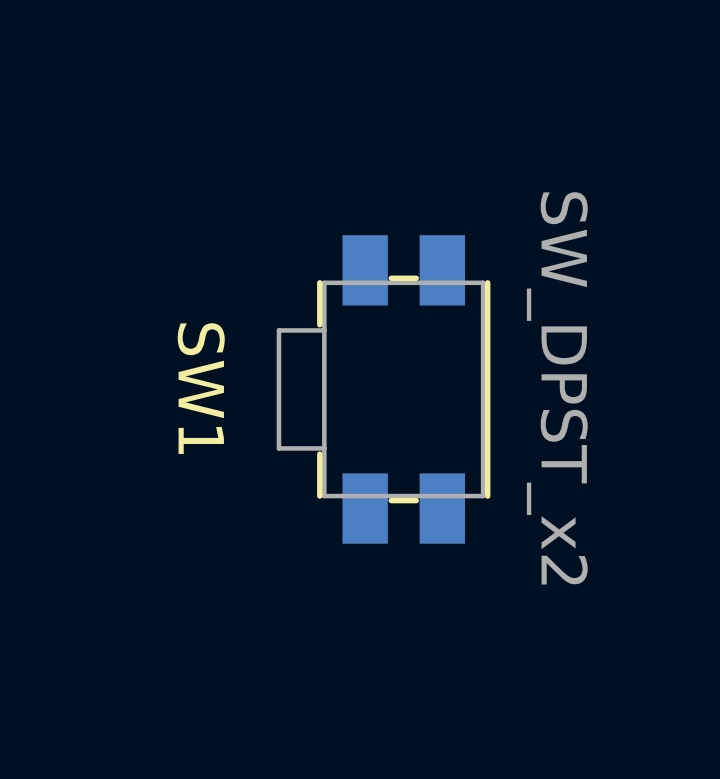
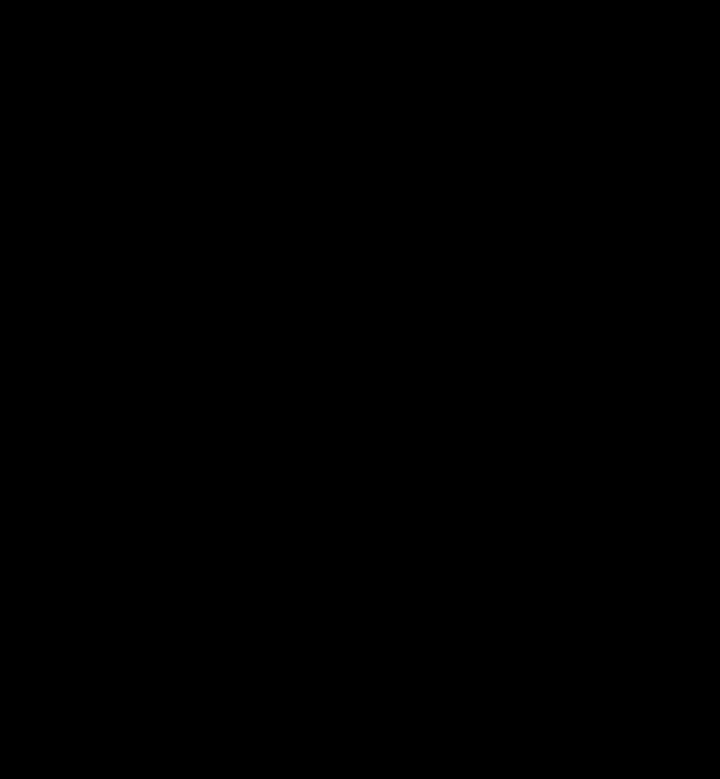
SW1: SW_DPST_x2 (383, 389) -> none

